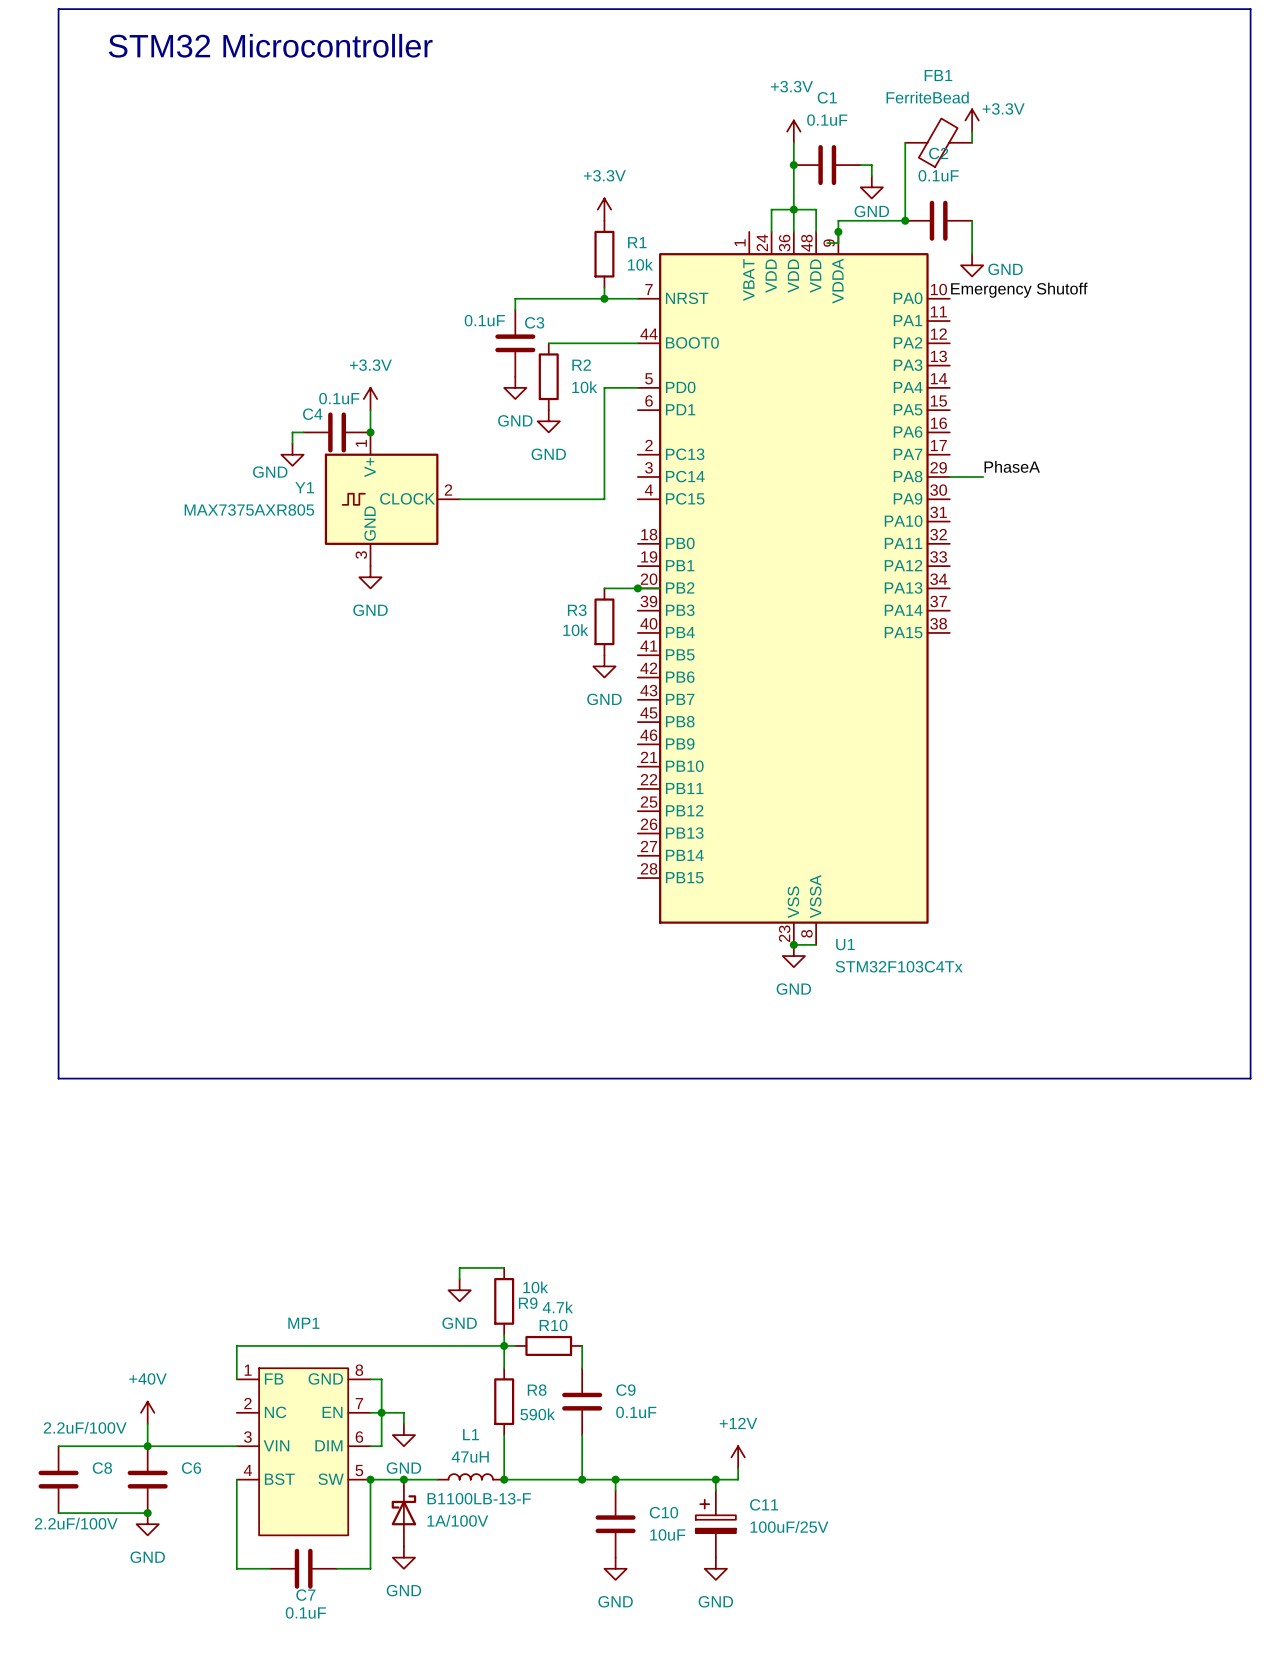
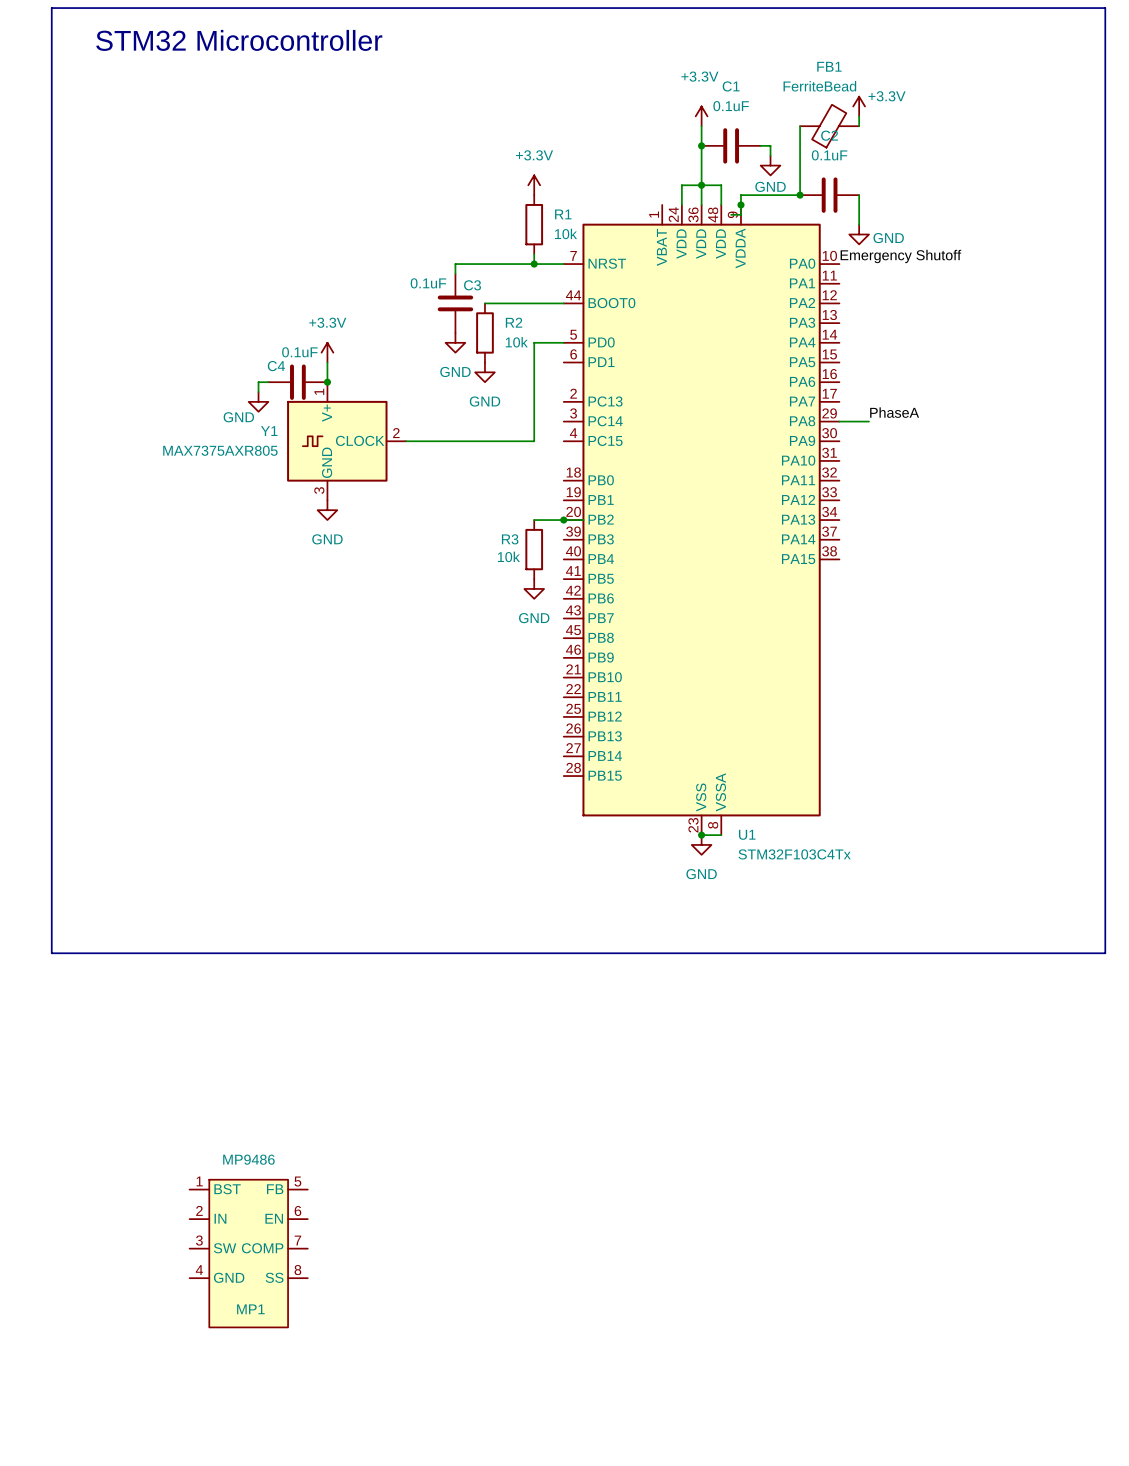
wire: (504, 1267) (459, 1267) (459, 1279) -> none
power symbol: GND (459, 1290) -> none
R9: 10k (504, 1301) -> none
MP1 value: none -> MP9486 (248, 1159)
MP1 name position: MP1 (303, 1323) -> MP1 (250, 1309)
wire: (504, 1334) (504, 1368) -> none
junction: (504, 1345) -> none
wire: (515, 1345) (236, 1345) (236, 1379) -> none
R10: 4.7k (548, 1345) -> none
wire: (582, 1345) (582, 1368) -> none
MP1 symbol: [236, 1368, 371, 1536] -> [189, 1179, 308, 1328]
wire: (370, 1379) (381, 1379) (381, 1446) (370, 1446) -> none
R8: 590k (504, 1401) -> none
C9: 0.1uF (582, 1401) -> none
power symbol: +40V (147, 1412) -> none
wire: (370, 1412) (403, 1412) (403, 1423) -> none
junction: (381, 1412) -> none
wire: (147, 1423) (147, 1446) -> none
power symbol: GND (403, 1435) -> none
wire: (504, 1435) (504, 1479) (738, 1479) (738, 1468) -> none
wire: (582, 1435) (582, 1479) -> none
wire: (58, 1446) (236, 1446) -> none
junction: (147, 1446) -> none
power symbol: +12V (738, 1457) -> none
L1: 47uH (470, 1476) -> none
C8: 2.2uF/100V (58, 1479) -> none
C6: 2.2uF/100V (147, 1479) -> none
wire: (236, 1479) (236, 1568) (270, 1568) -> none
junction: (370, 1479) -> none
junction: (403, 1479) -> none
wire: (437, 1479) (370, 1479) (370, 1568) (337, 1568) -> none
junction: (504, 1479) -> none
junction: (582, 1479) -> none
wire: (615, 1479) (615, 1490) -> none
junction: (615, 1479) -> none
wire: (715, 1479) (715, 1490) -> none
junction: (715, 1479) -> none
wire: (58, 1513) (147, 1513) -> none
junction: (147, 1513) -> none
B1100LB-13-F: 1A/100V (403, 1513) -> none
power symbol: GND (147, 1524) -> none
C10: 10uF (615, 1524) -> none
C11: 100uF/25V (715, 1524) -> none
power symbol: GND (403, 1557) -> none
C7: 0.1uF (303, 1568) -> none
power symbol: GND (615, 1568) -> none
power symbol: GND (715, 1568) -> none

